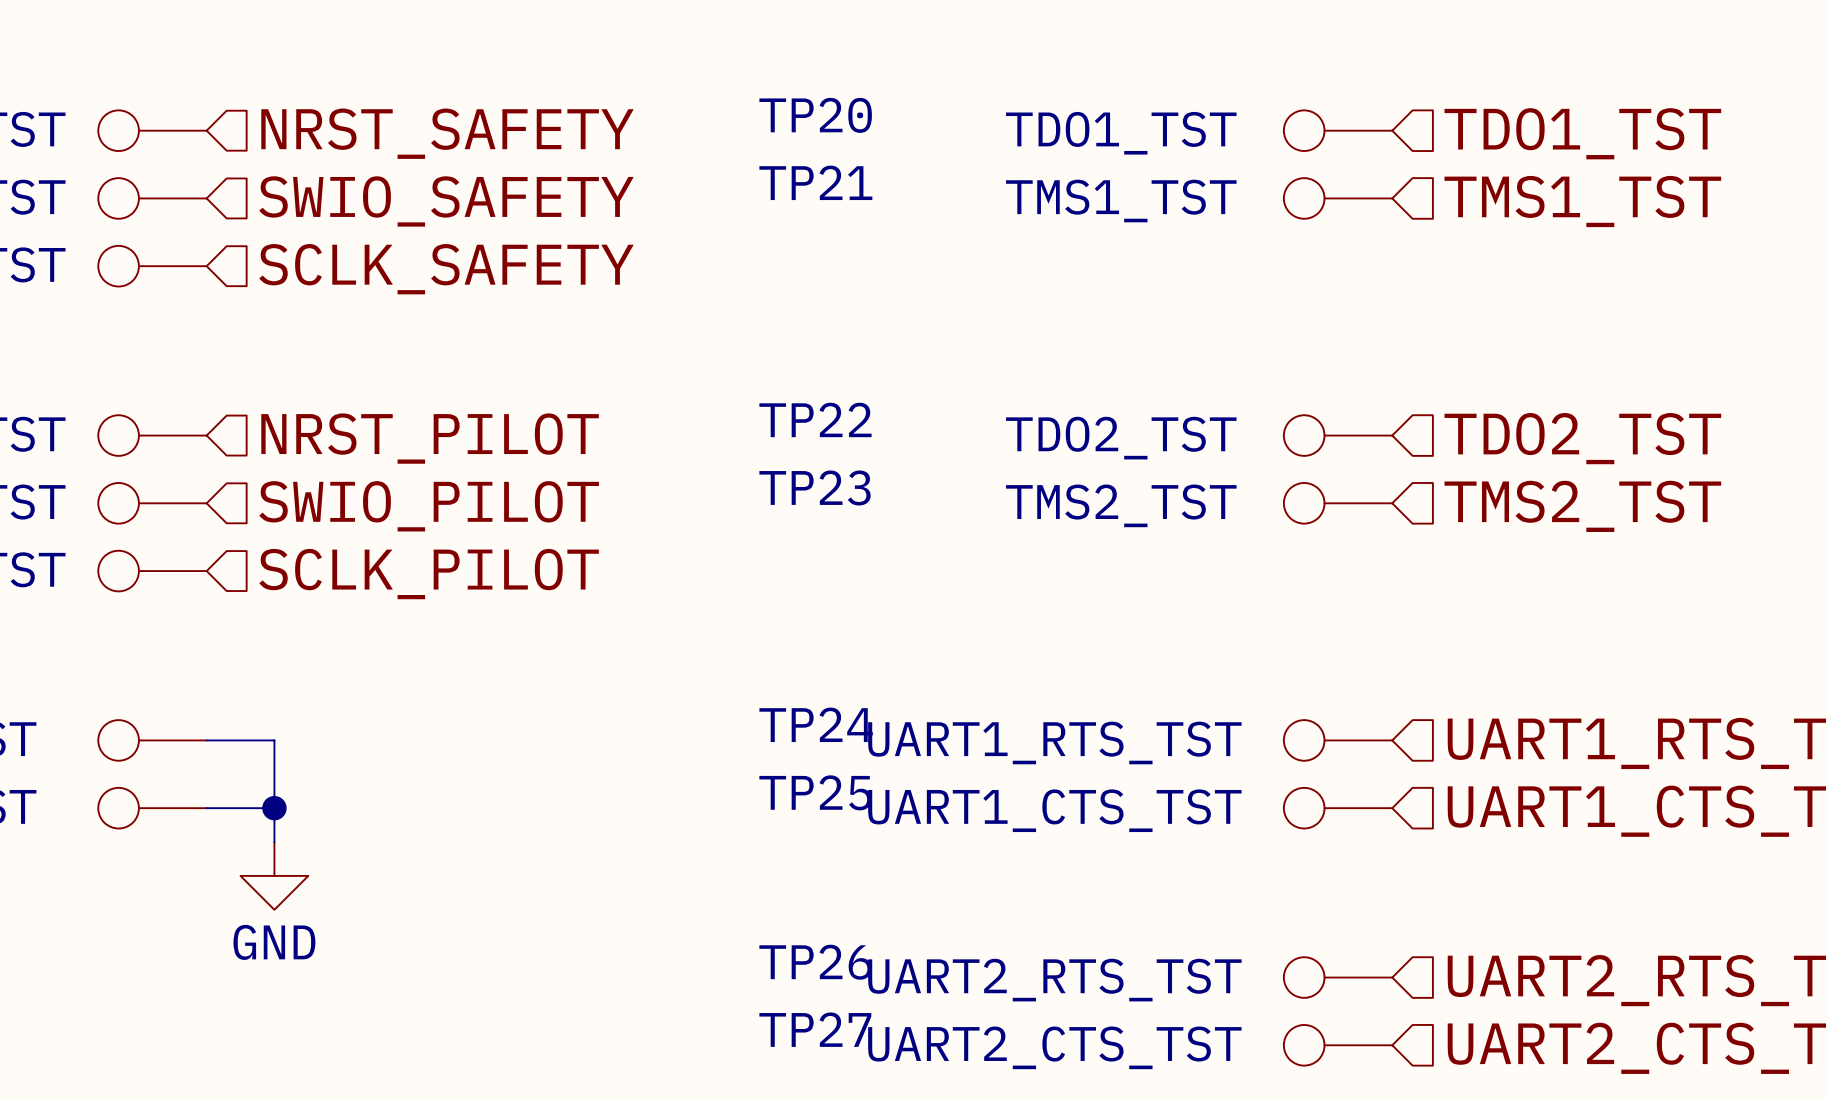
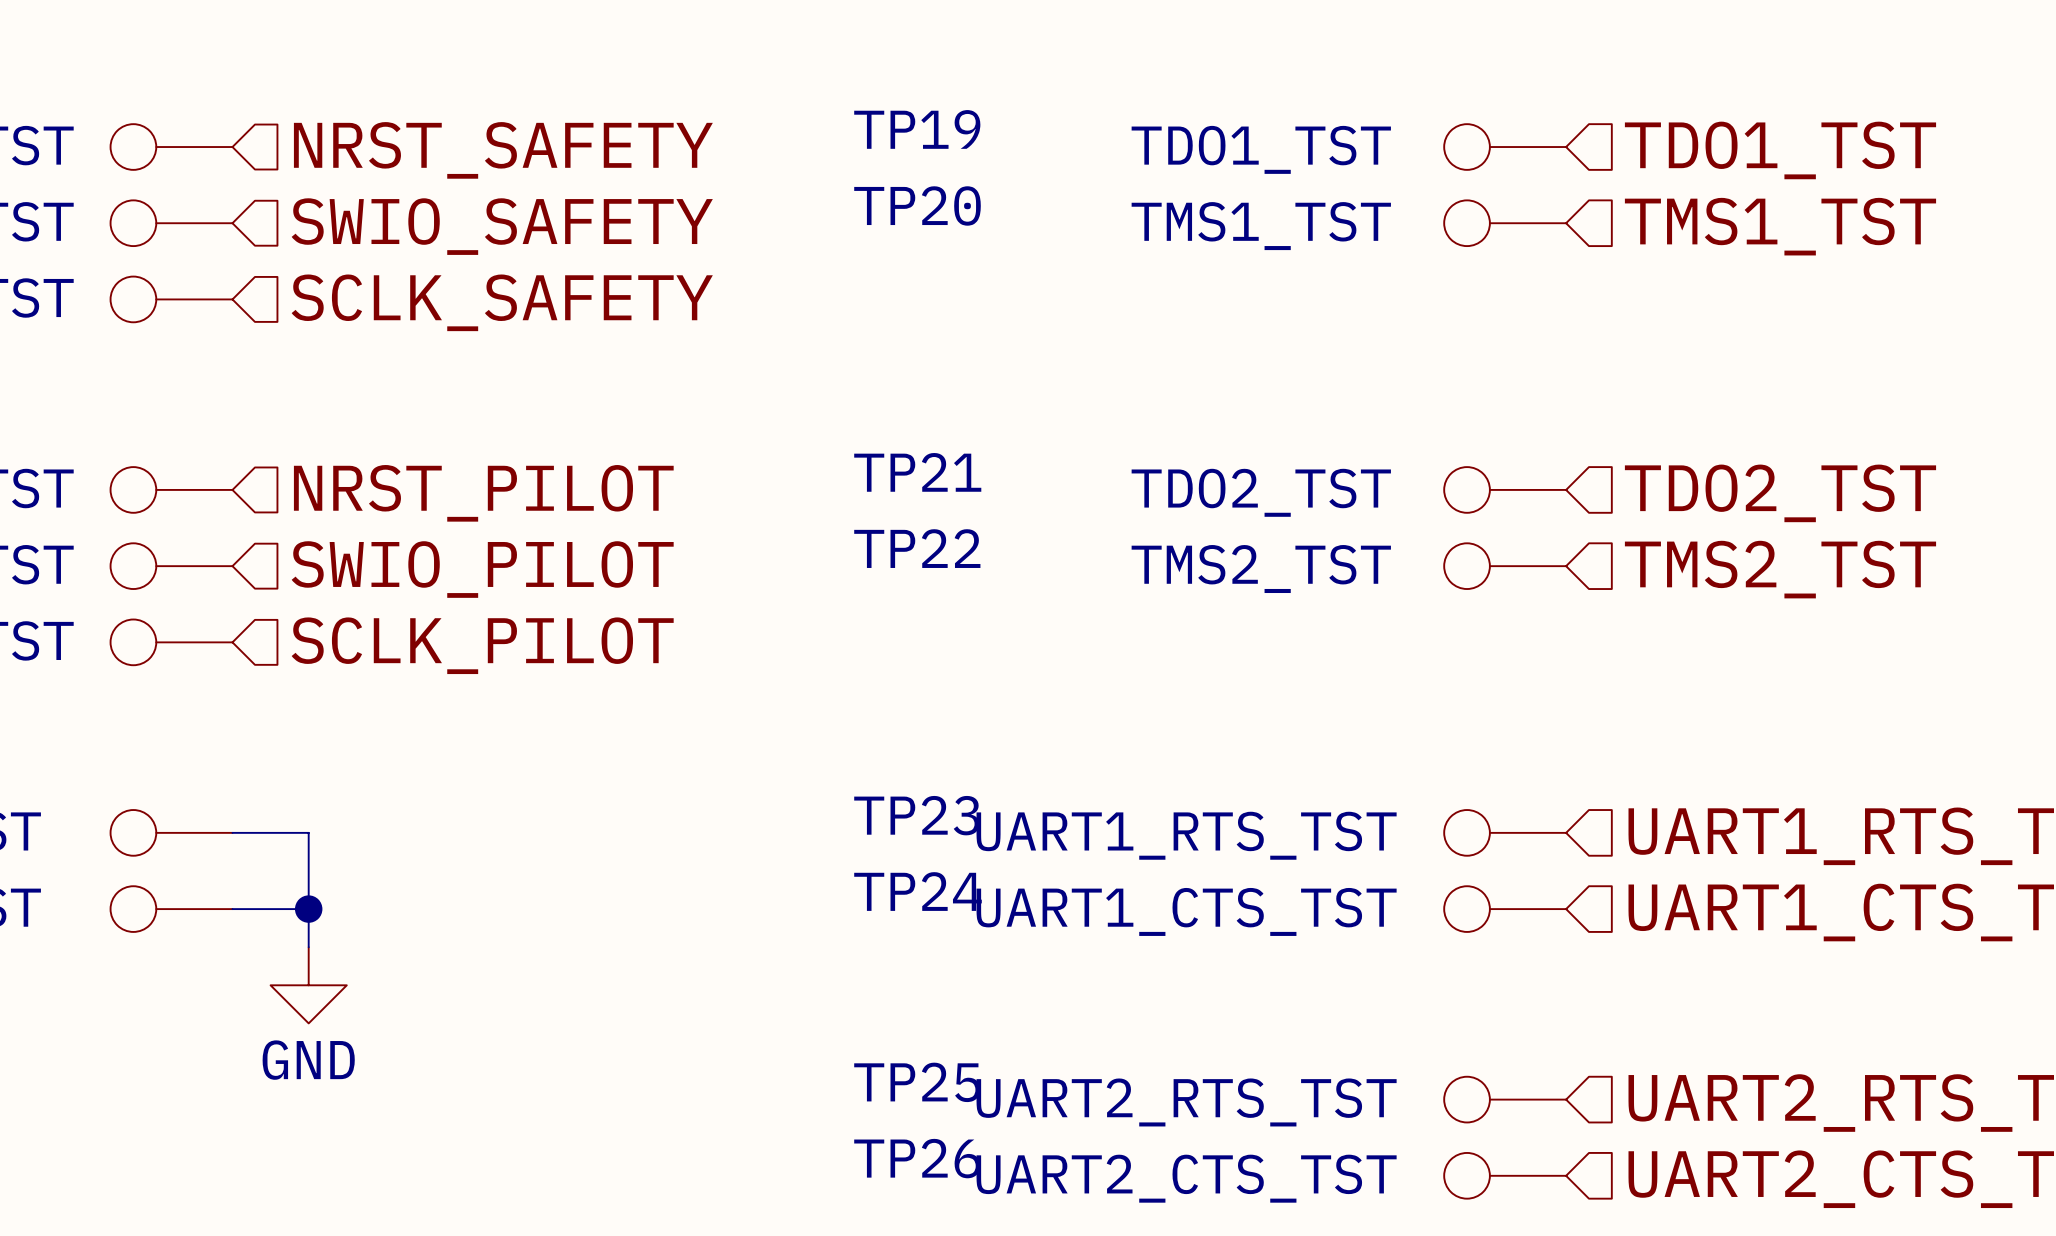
TP20 name: TP20 (815, 115) -> TP19 (917, 129)
TP21 name: TP21 (815, 182) -> TP20 (917, 205)
TP22 name: TP22 (815, 419) -> TP21 (917, 472)
TP23 name: TP23 (815, 487) -> TP22 (917, 548)
TP24 name: TP24 (816, 724) -> TP23 (916, 815)
TP25 name: TP25 (815, 792) -> TP24 (917, 891)
TP26 name: TP26 (815, 962) -> TP25 (917, 1082)
TP27 name: TP27 (815, 1029) -> TP26 (917, 1158)

